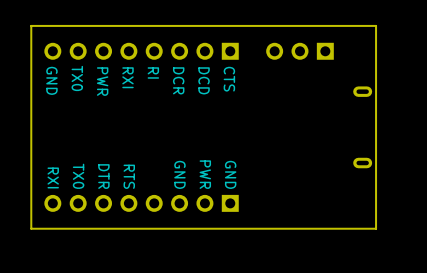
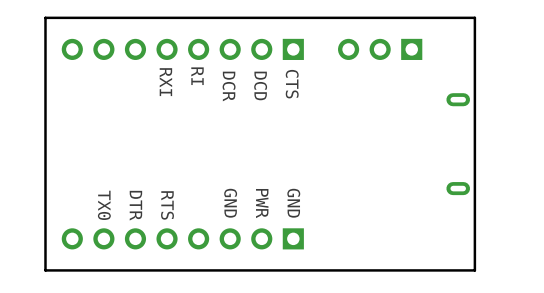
text: TX0 (77, 78) -> none
text: GND (51, 80) -> none
text: PWR (102, 81) -> none
text: RXI (53, 177) -> none

